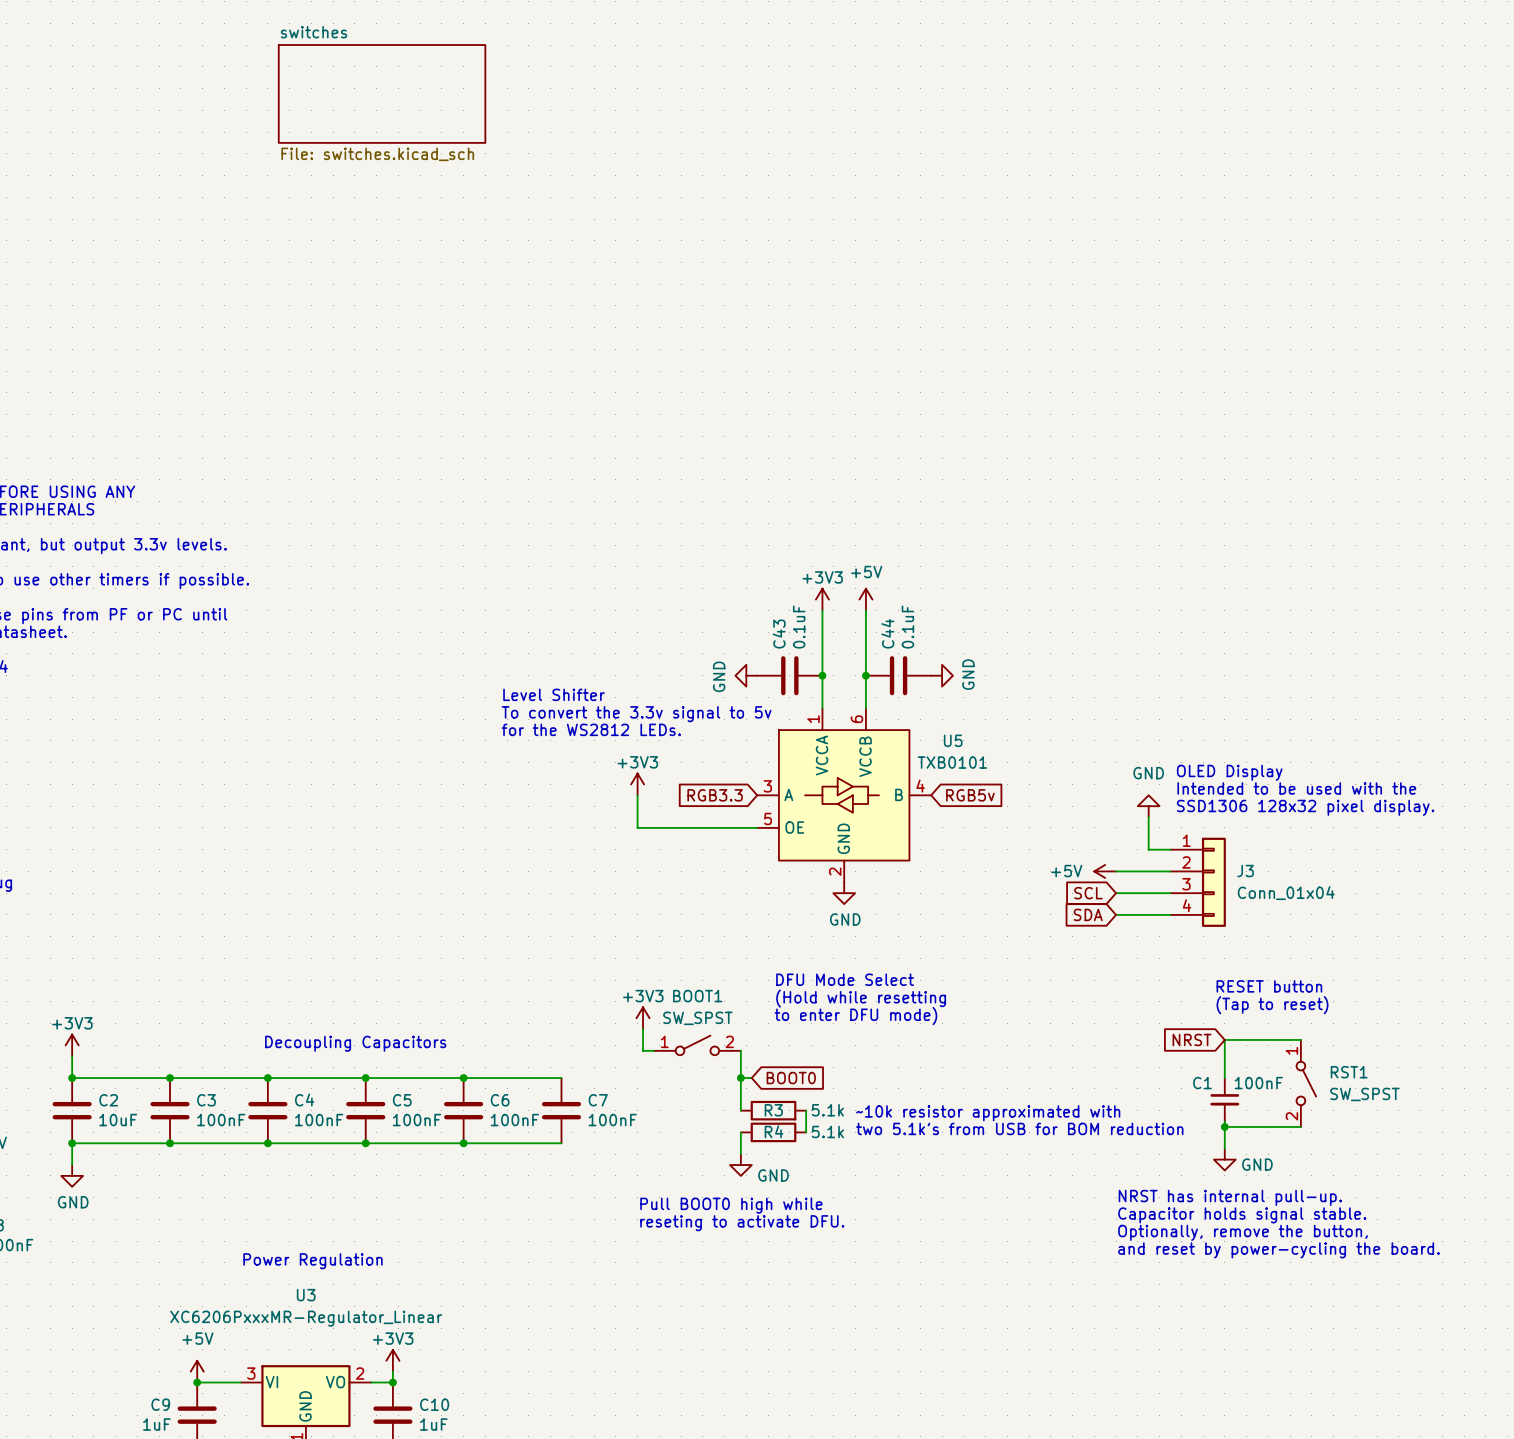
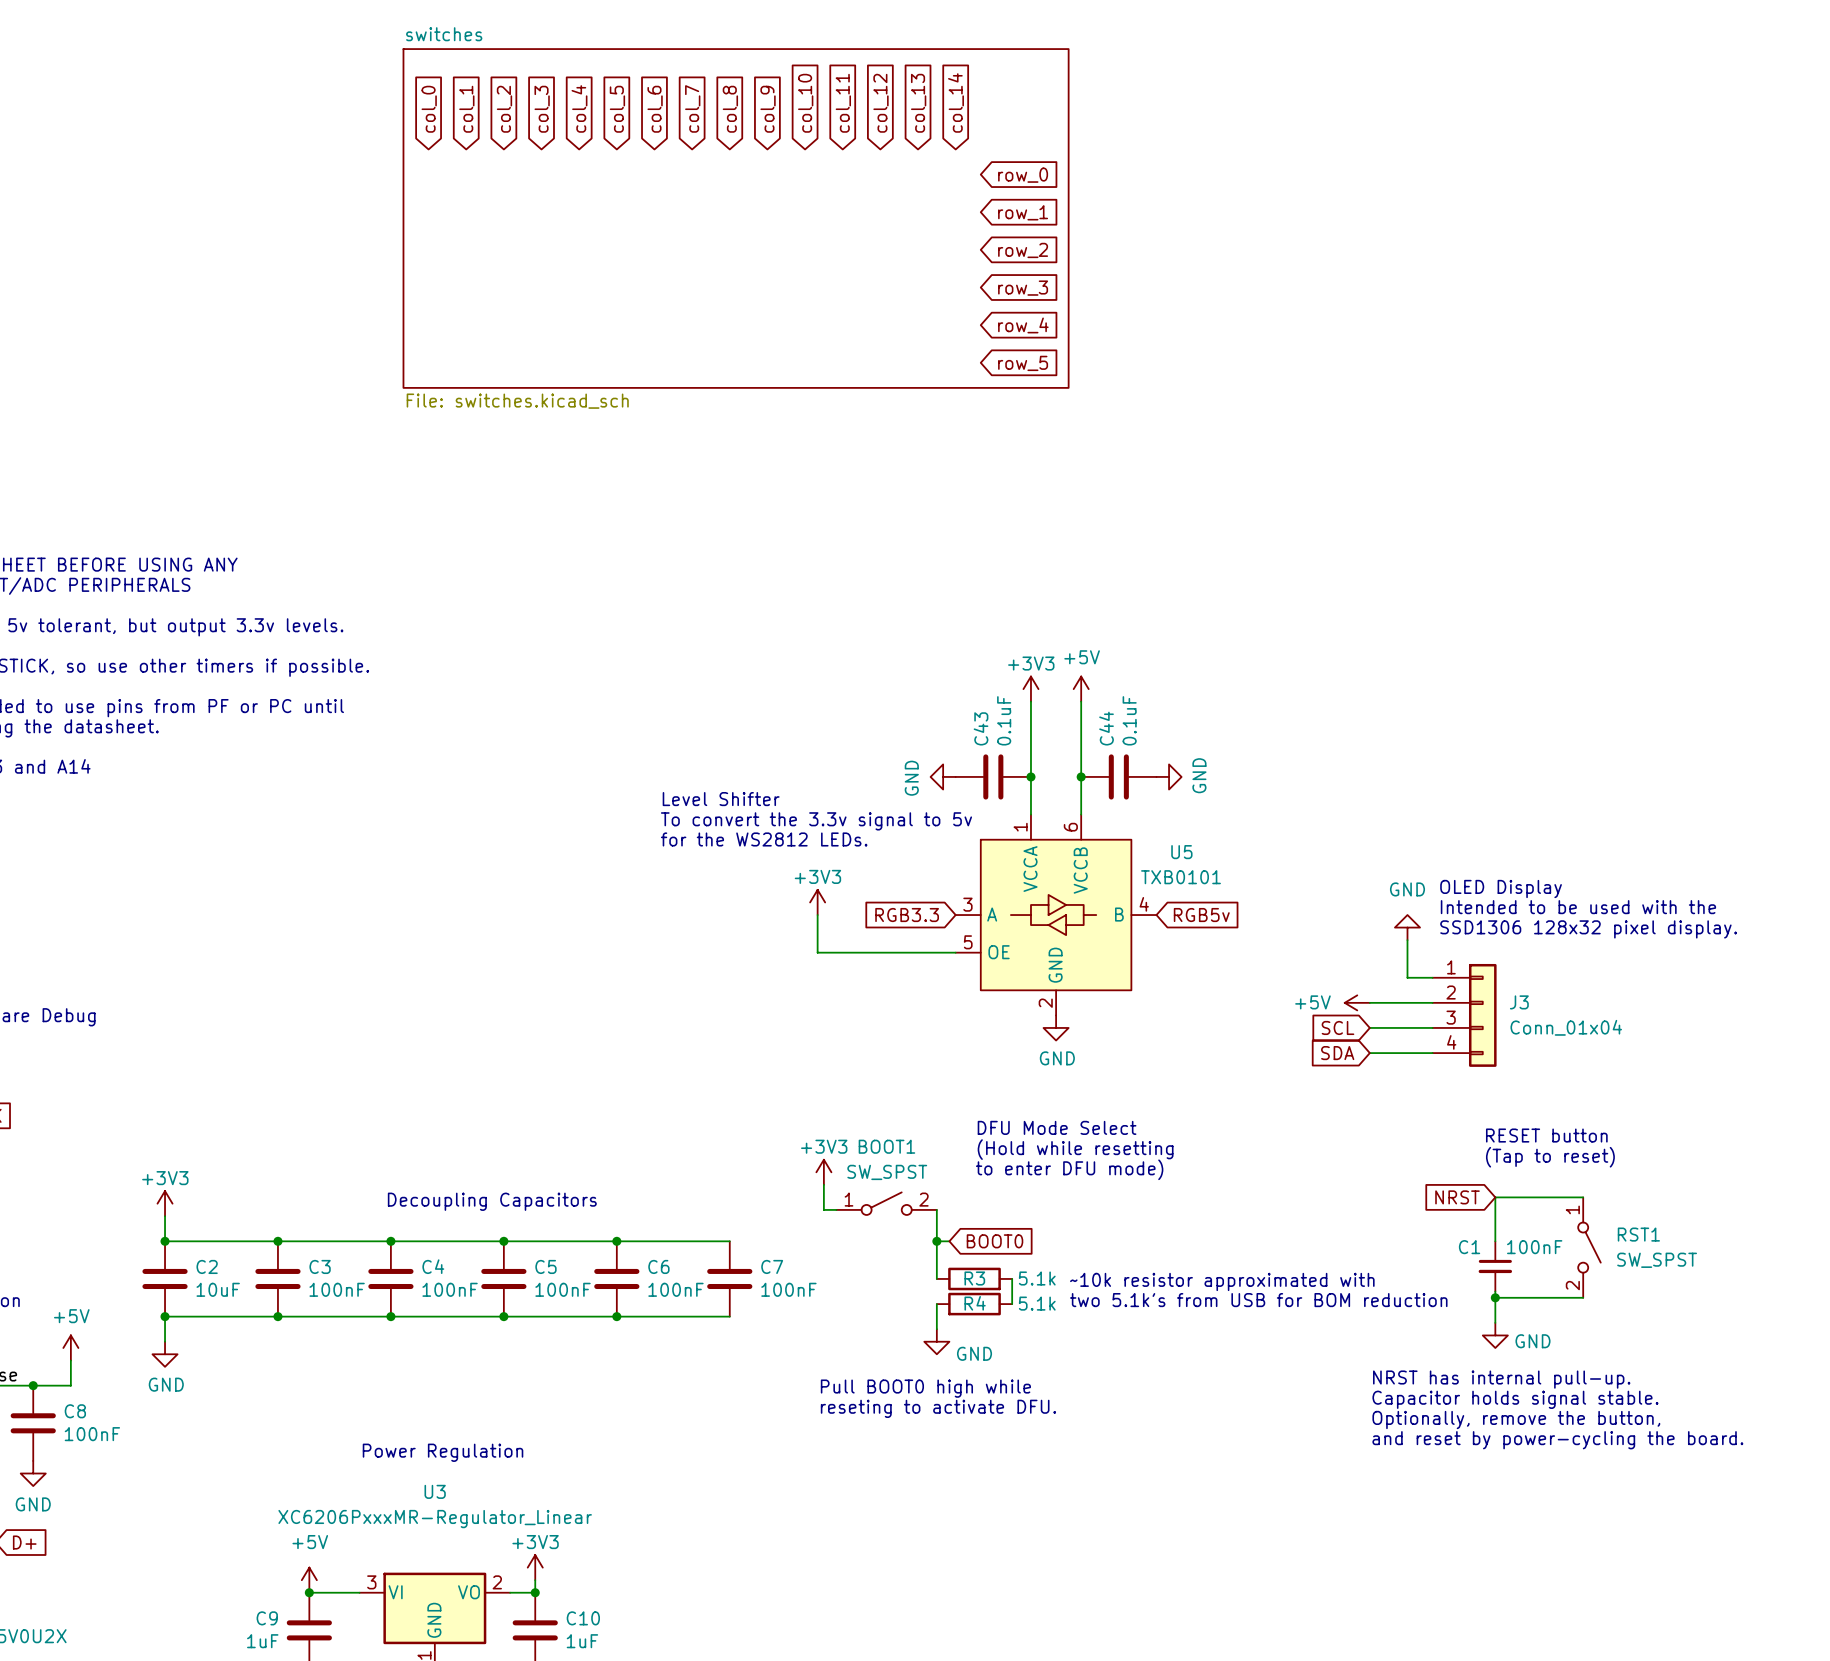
global label: none -> col_10 (805, 103)
global label: none -> col_11 (843, 103)
global label: none -> col_12 (880, 103)
global label: none -> col_13 (918, 103)
global label: none -> col_14 (955, 102)
sheet switches: File: switches.kicad_sch (382, 93) -> none
global label: none -> col_4 (579, 108)
global label: none -> col_7 (692, 108)
global label: none -> col_0 (429, 109)
global label: none -> col_1 (466, 109)
global label: none -> col_2 (504, 109)
global label: none -> col_3 (542, 109)
global label: none -> col_5 (617, 109)
global label: none -> col_6 (655, 109)
global label: none -> col_8 (730, 109)
global label: none -> col_9 (768, 109)
global label: none -> row_0 (1023, 175)
global label: none -> row_1 (1023, 212)
sheet switches: none -> File: switches.kicad_sch (736, 218)
global label: none -> row_2 (1023, 250)
global label: none -> row_3 (1023, 288)
global label: none -> row_4 (1023, 325)
global label: none -> row_5 (1023, 363)

